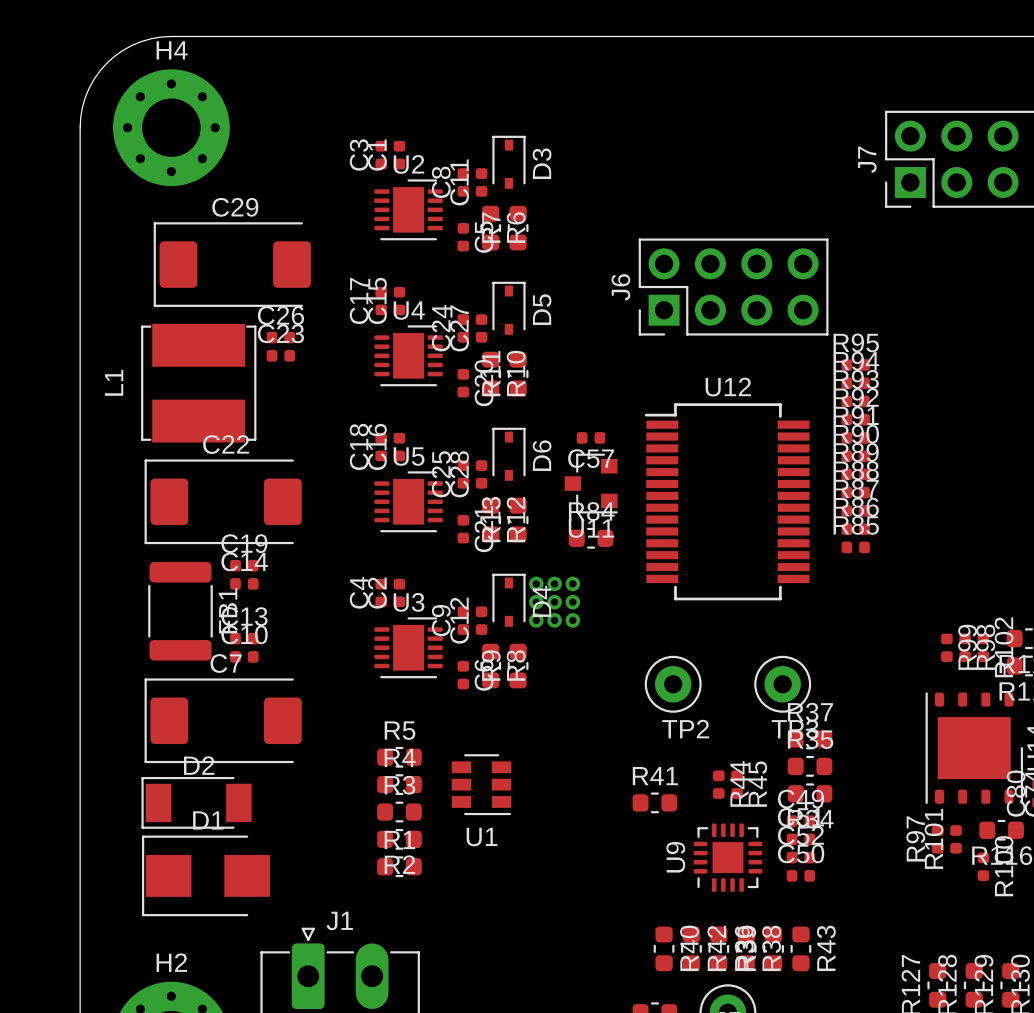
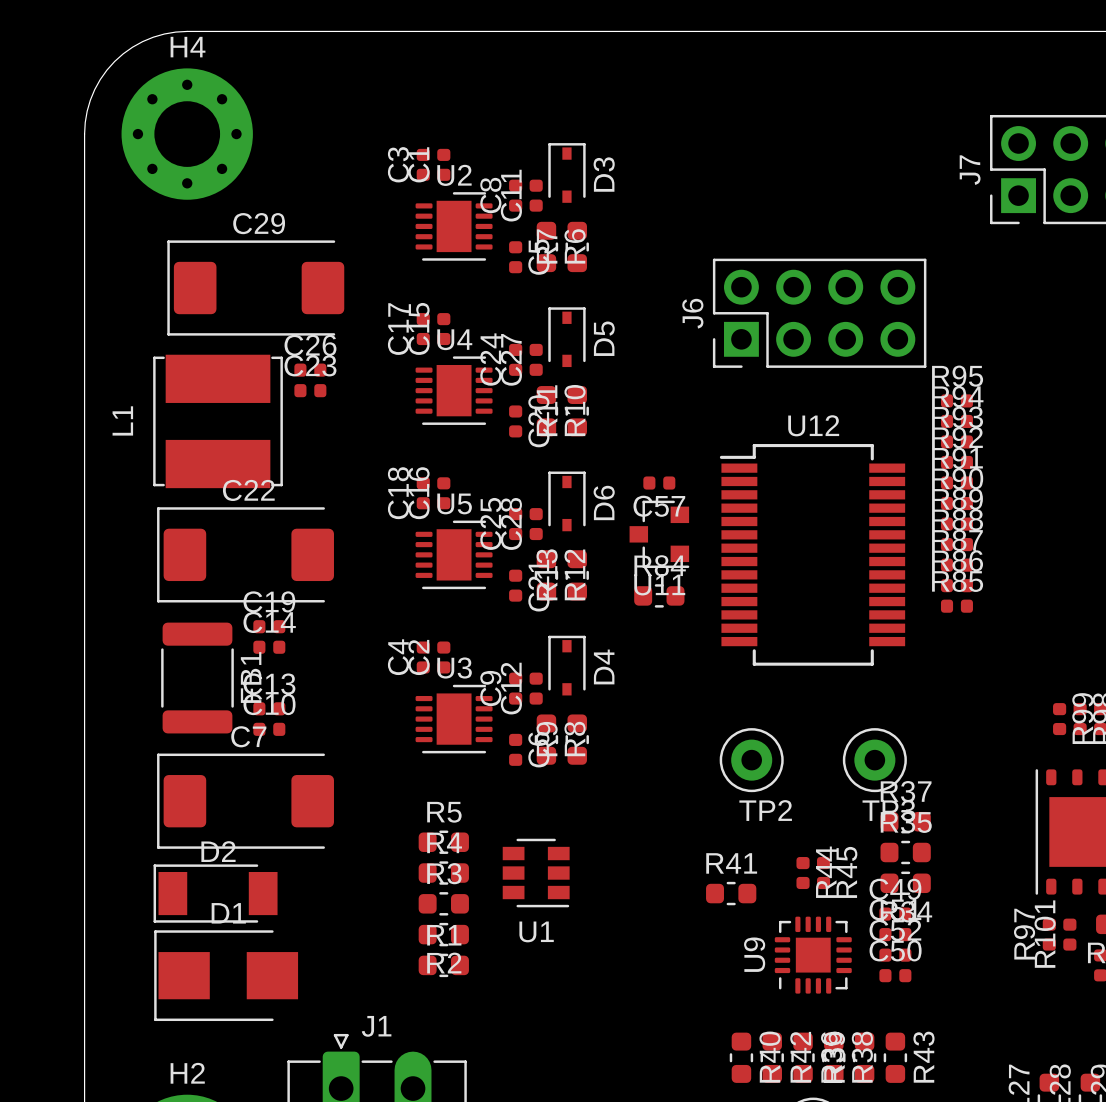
via: (536, 583) -> none
via: (554, 583) -> none
via: (572, 583) -> none
via: (536, 602) -> none
via: (554, 602) -> none
via: (572, 602) -> none
via: (536, 620) -> none
via: (554, 620) -> none
via: (572, 620) -> none

